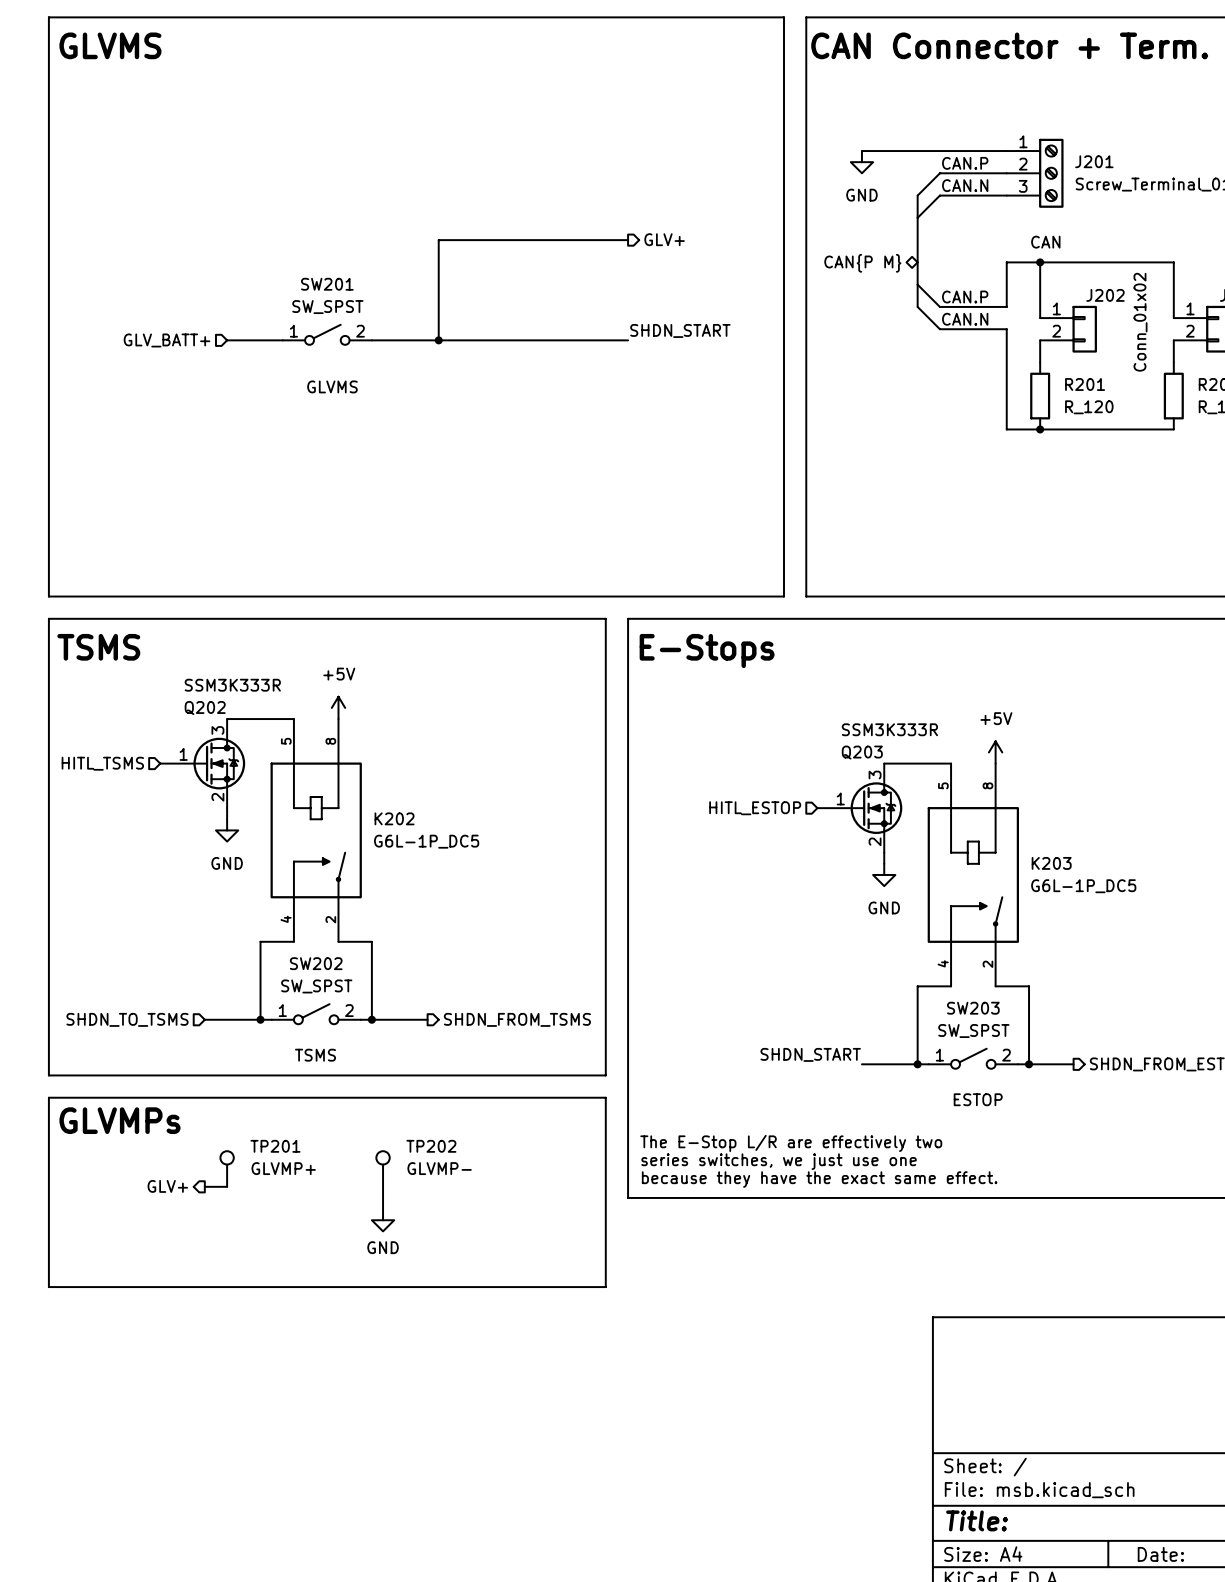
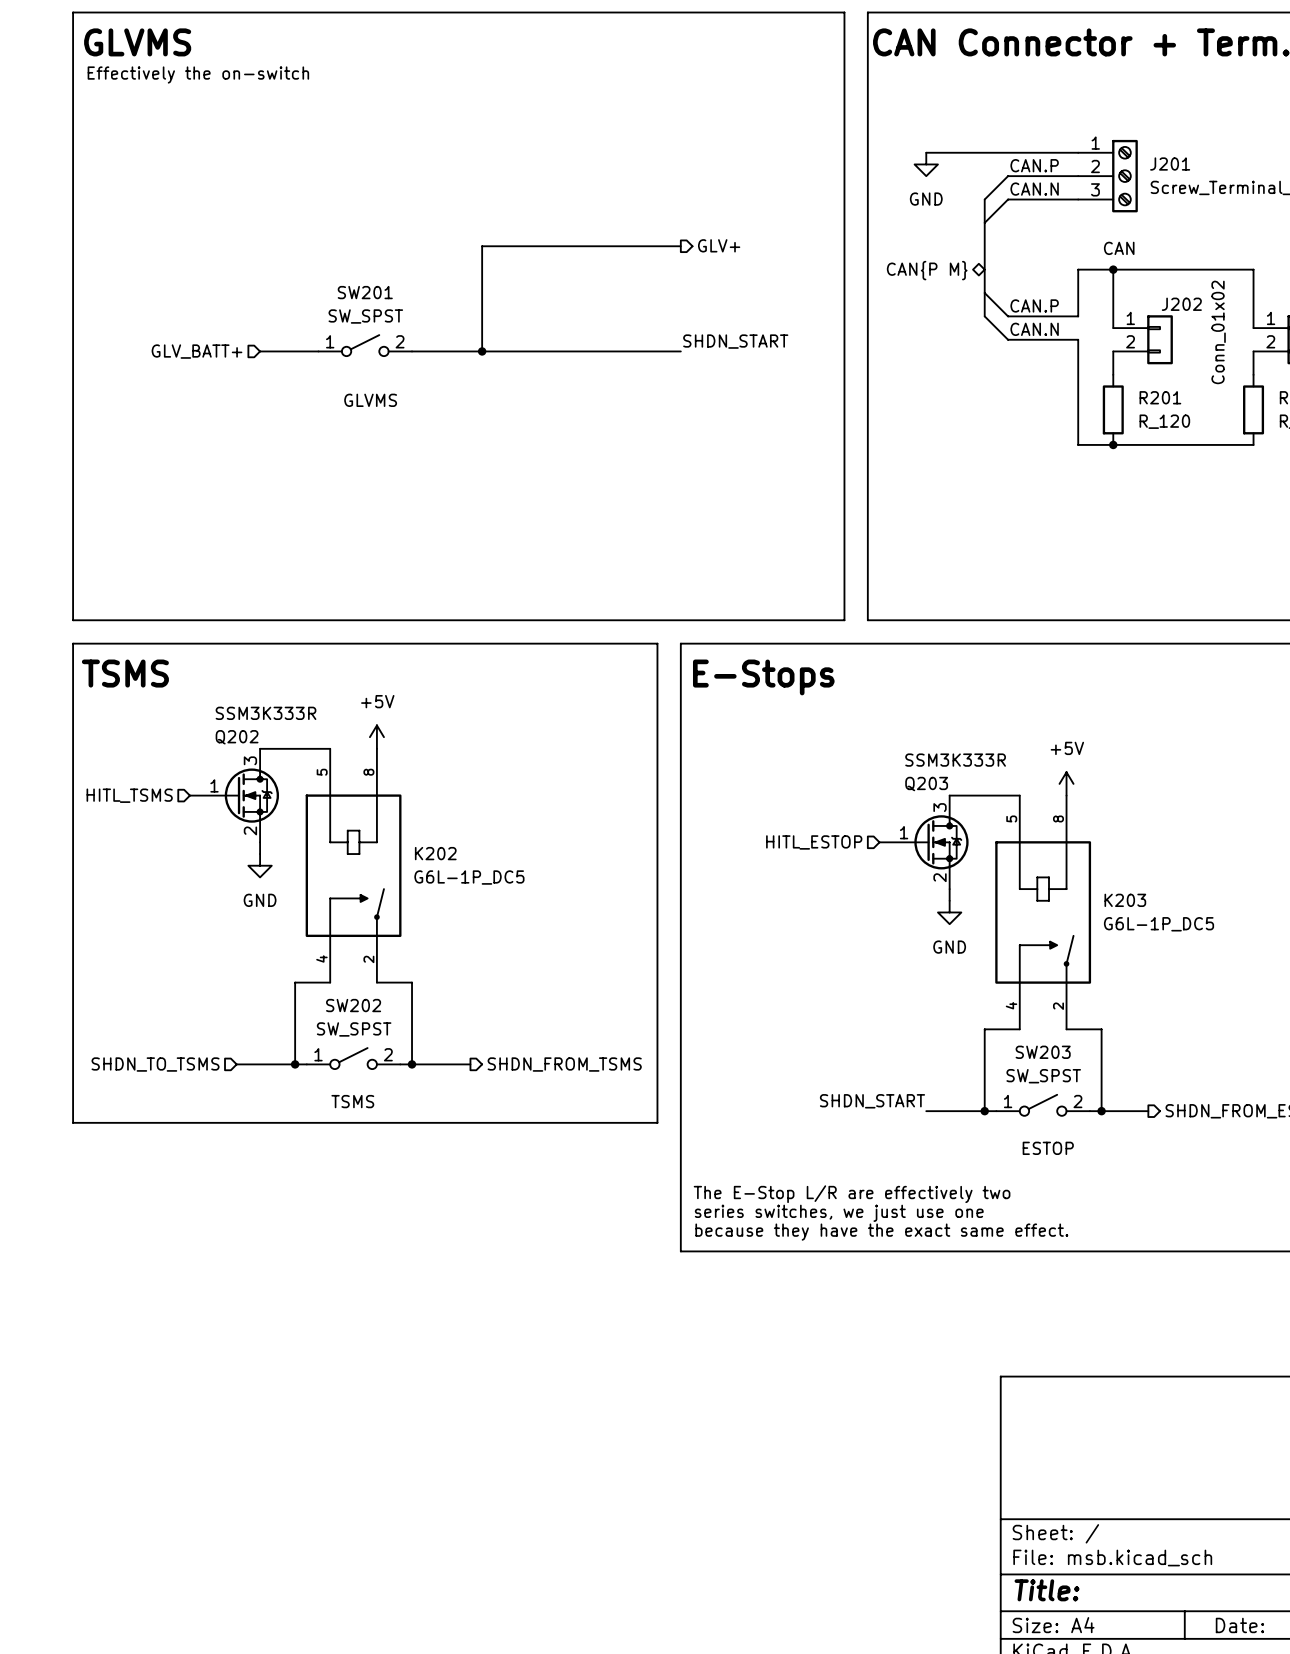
text: none -> Effectively the on-switch (198, 75)
line: (48, 1097) (605, 1097) (605, 1287) (48, 1287) (48, 1097) -> none
text: GLVMPs (119, 1120) -> none
TP201: GLVMP+ (227, 1169) -> none
TP202: GLVMP- (383, 1169) -> none
hierarchical label: GLV+ (167, 1186) -> none
wire: (204, 1186) (227, 1186) -> none
wire: (383, 1186) (383, 1209) -> none
power symbol: GND (383, 1220) -> none

